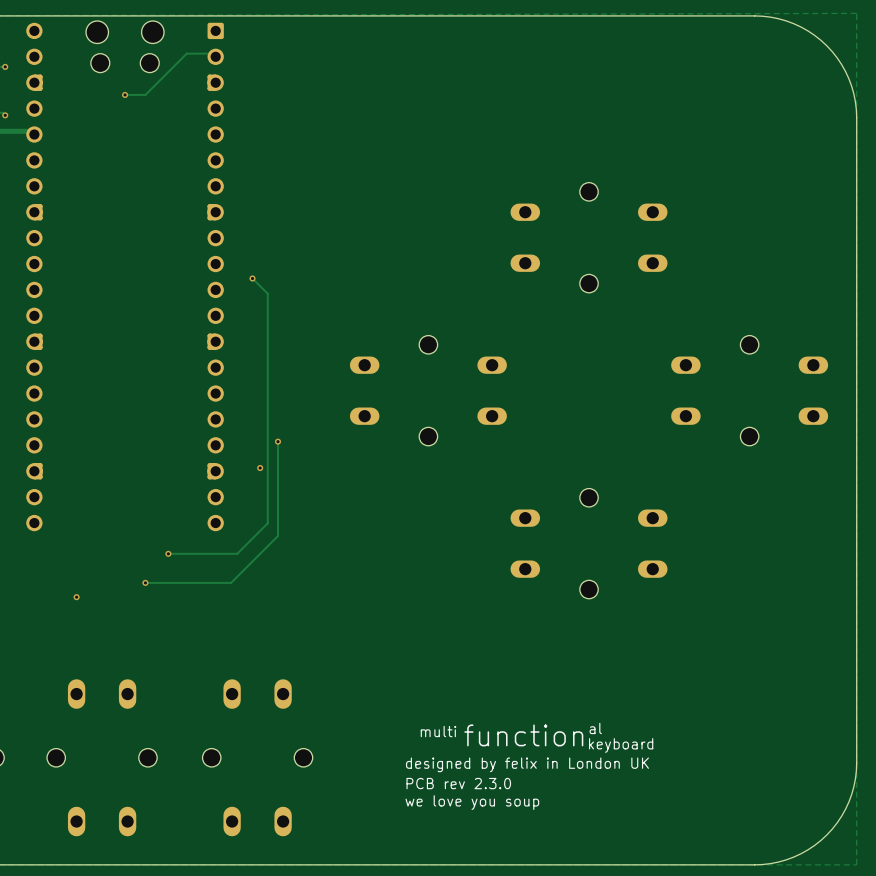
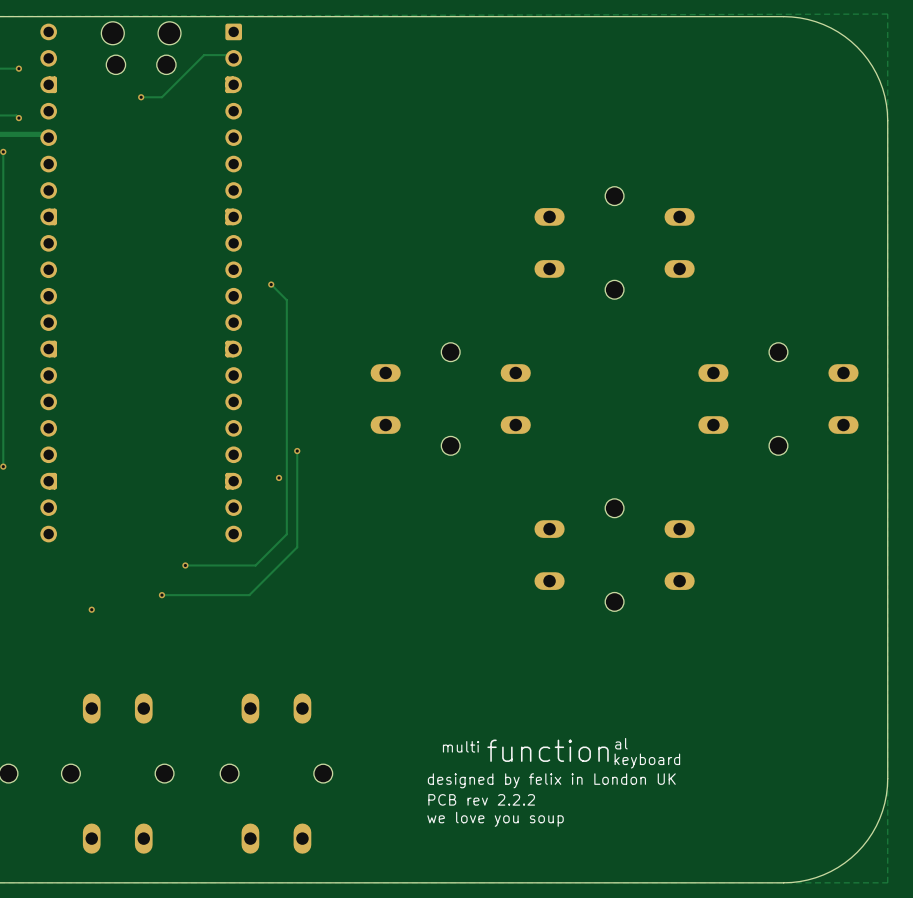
text: PCB rev 2.3.0 (458, 783) -> PCB rev 2.2.2 (481, 799)

